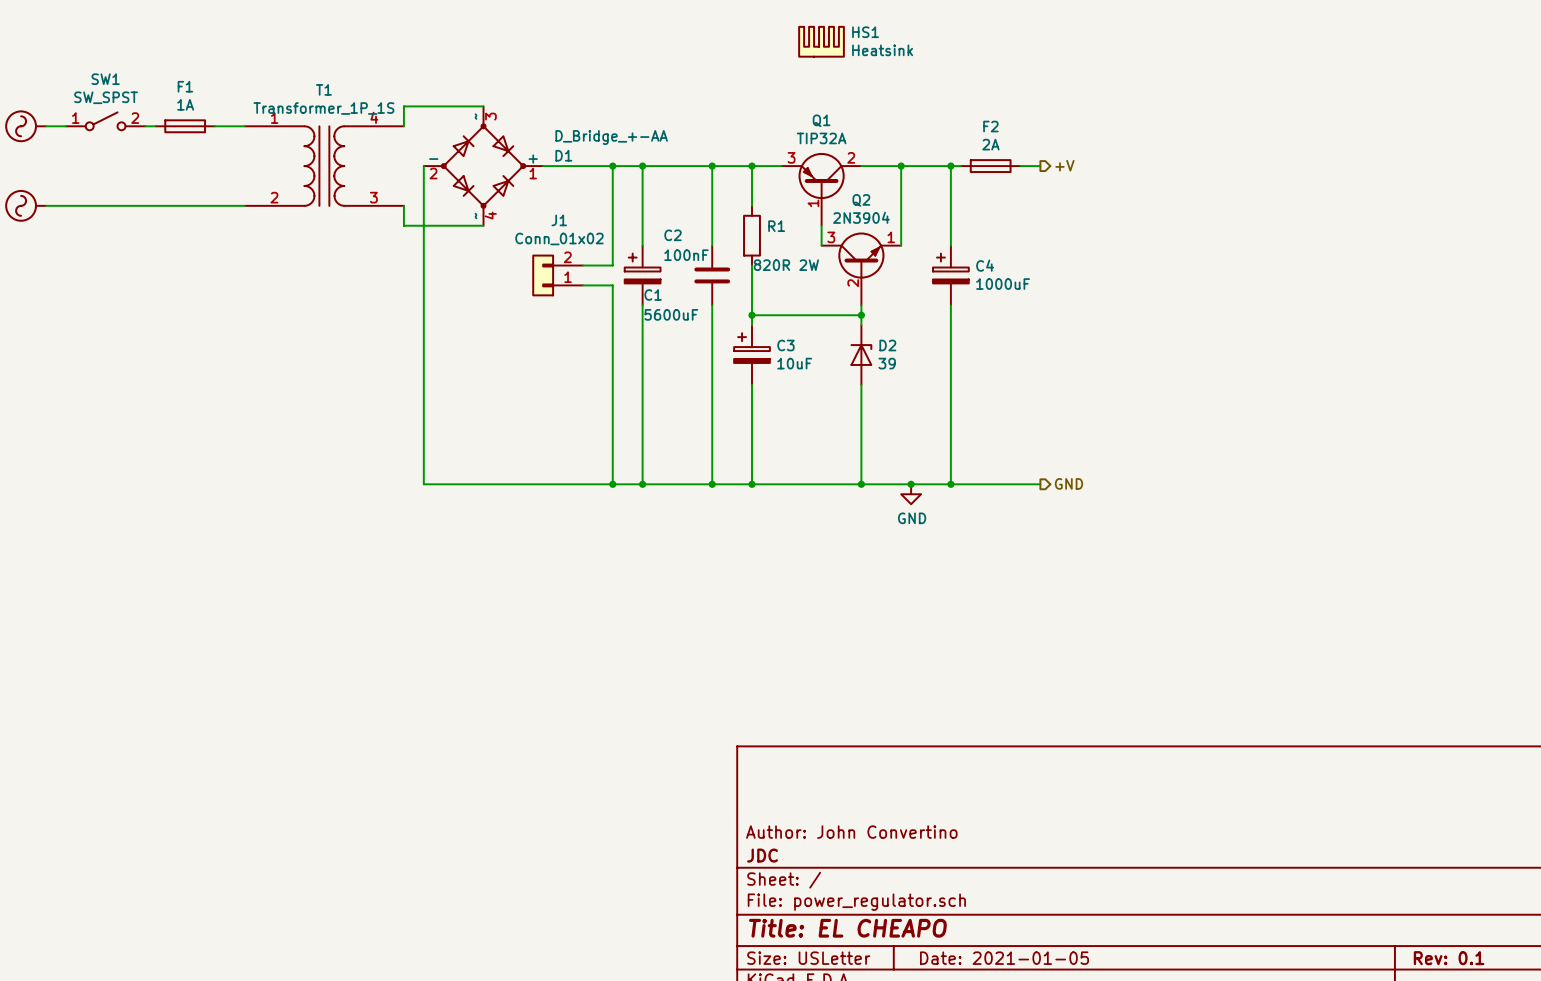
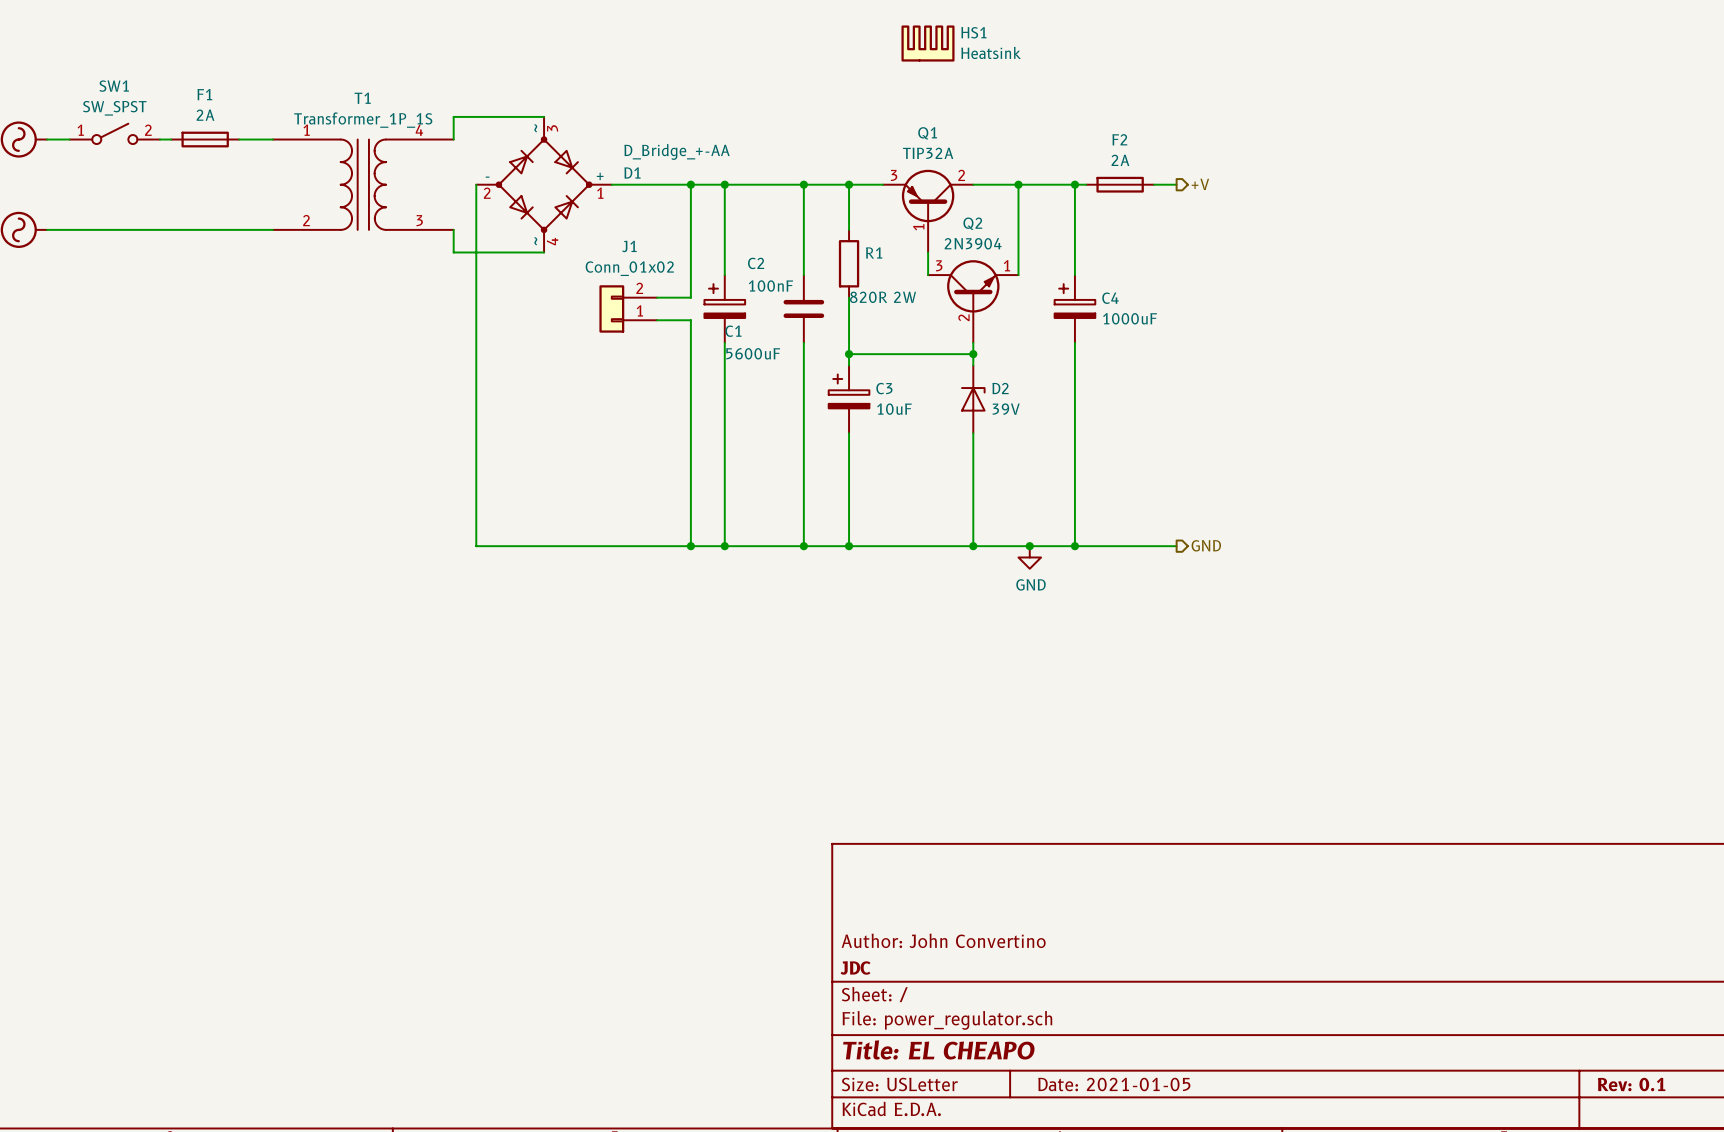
F1 value: 1A (185, 104) -> 2A (205, 115)
D2 value: 39 (887, 363) -> 39V (1006, 409)

